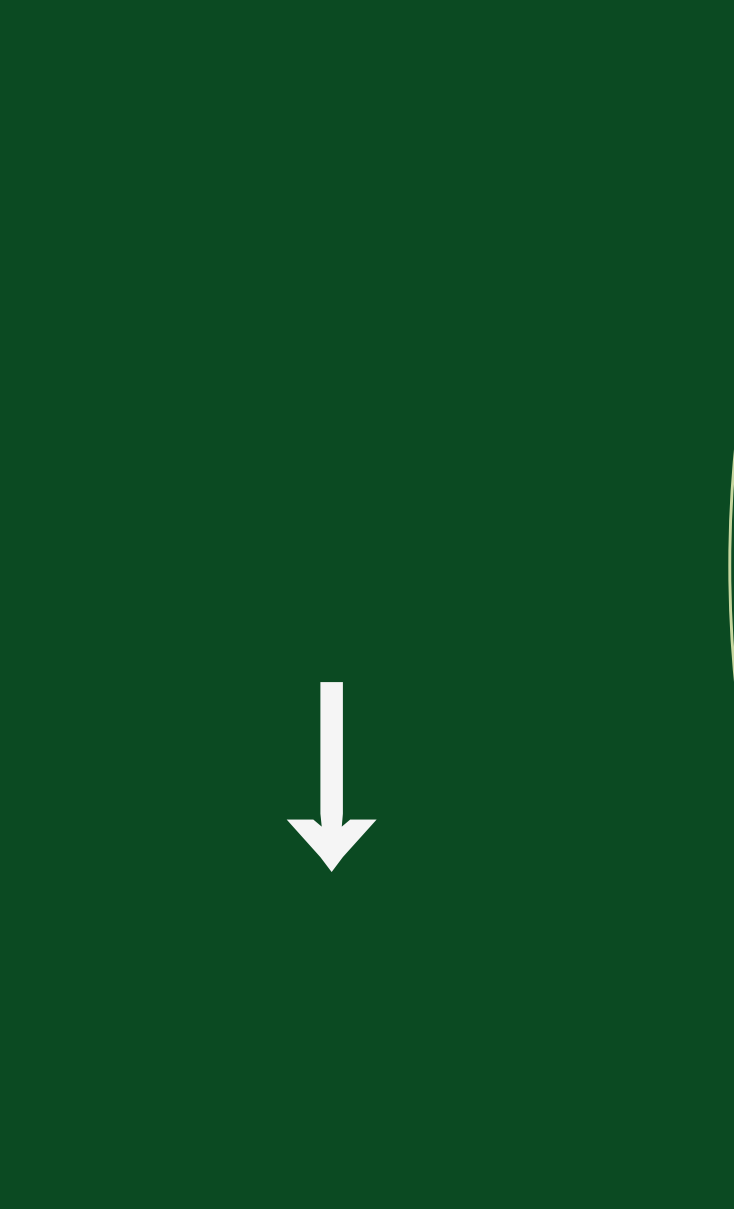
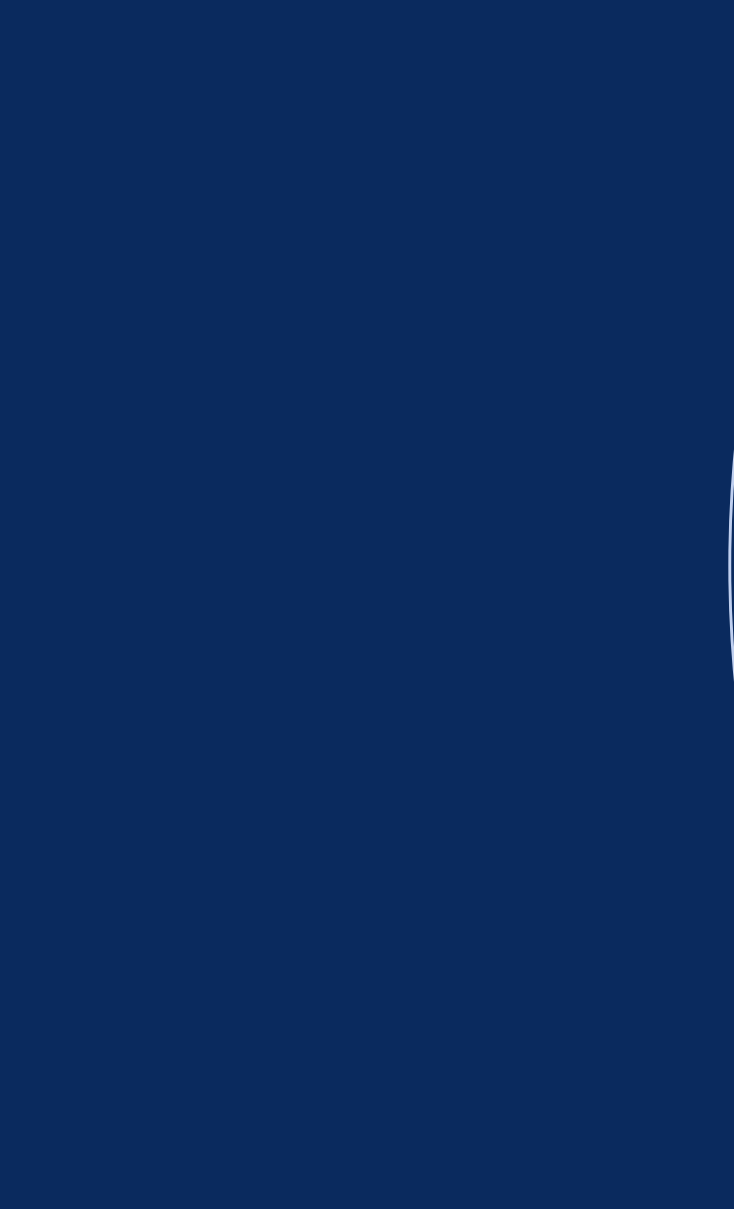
text: ↓ (331, 777) -> none

